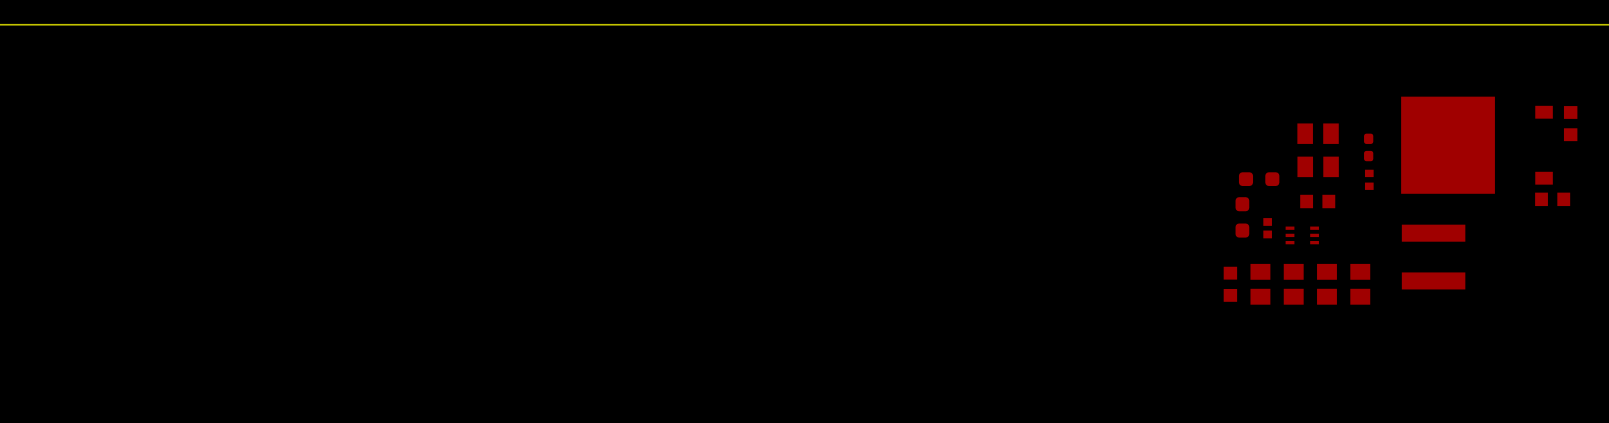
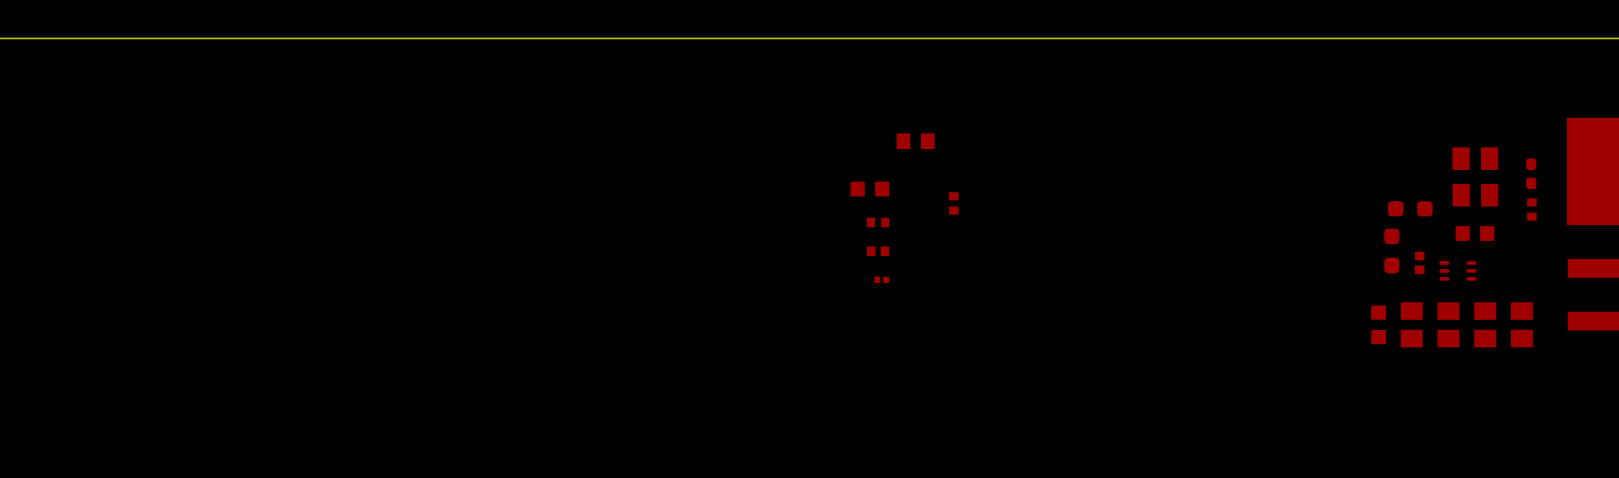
part: none -> (915, 141)
part: none -> (869, 189)
part: none -> (953, 203)
part: none -> (878, 222)
part: none -> (878, 251)
part: none -> (881, 279)

